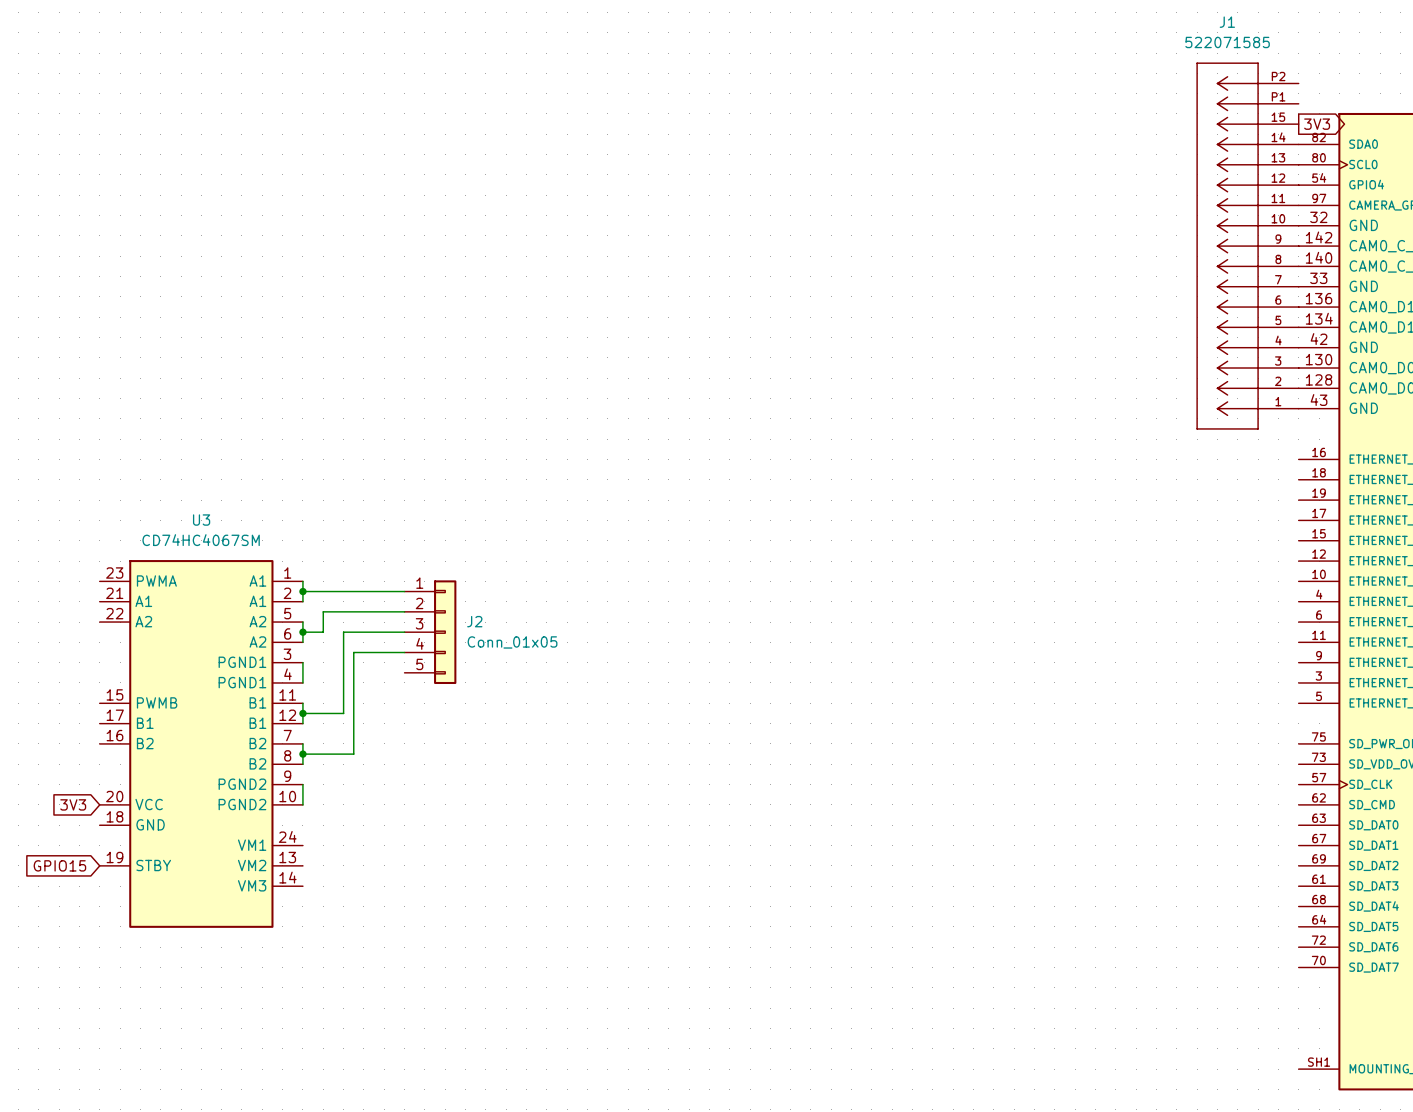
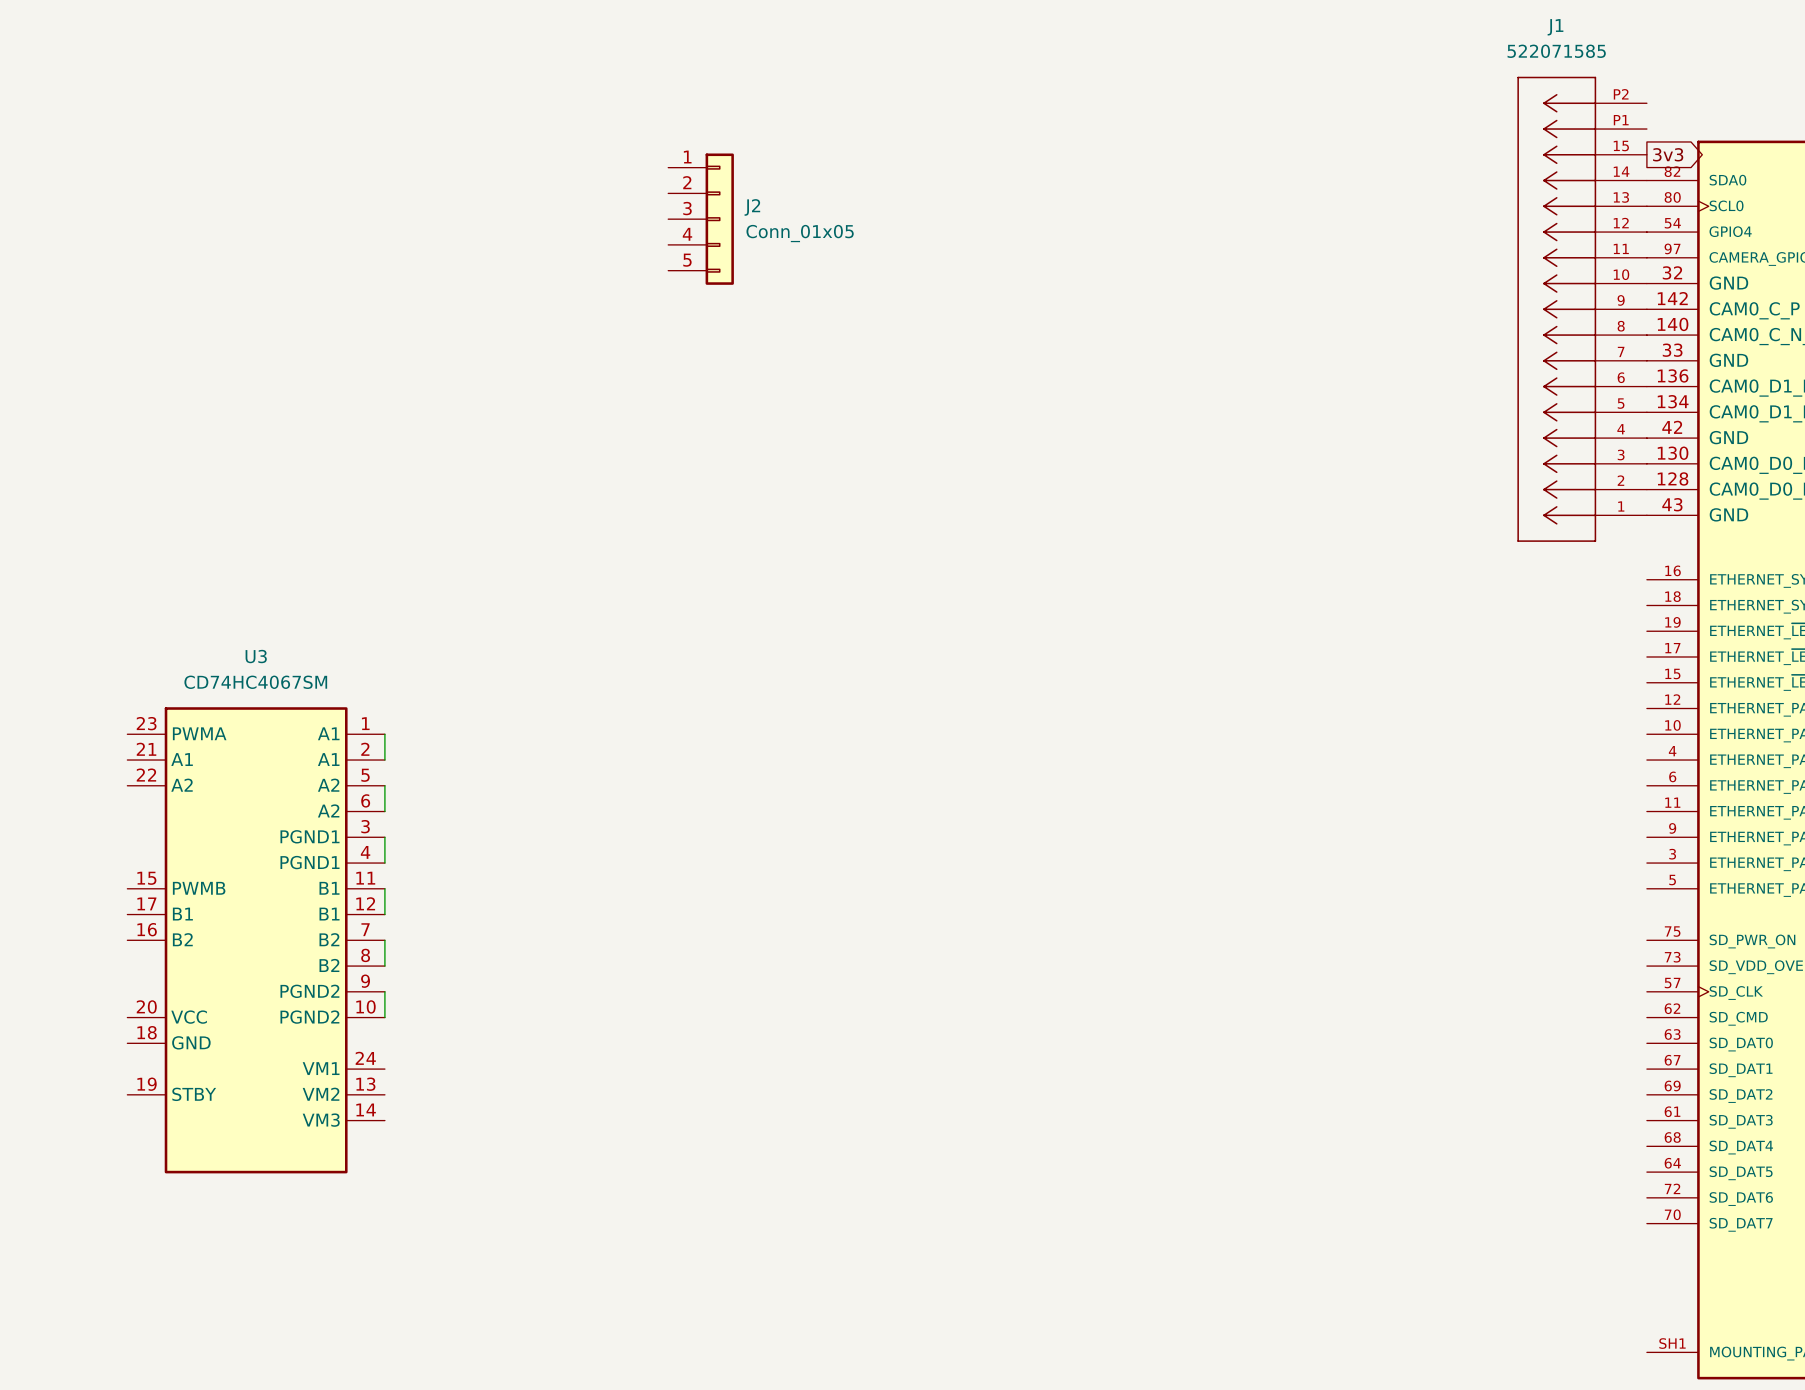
global label: 3V3 (1317, 124) -> 3v3 (1668, 154)
wire: (302, 591) (404, 591) -> none
junction: (302, 591) -> none
wire: (404, 611) (323, 611) (323, 632) (302, 632) -> none
junction: (302, 632) -> none
wire: (404, 632) (343, 632) (343, 713) (302, 713) -> none
J2 position: (430, 632) -> (701, 219)
wire: (404, 652) (353, 652) (353, 754) (302, 754) -> none
junction: (302, 713) -> none
junction: (302, 754) -> none
global label: 3V3 (73, 804) -> none
global label: GPIO15 (59, 865) -> none

